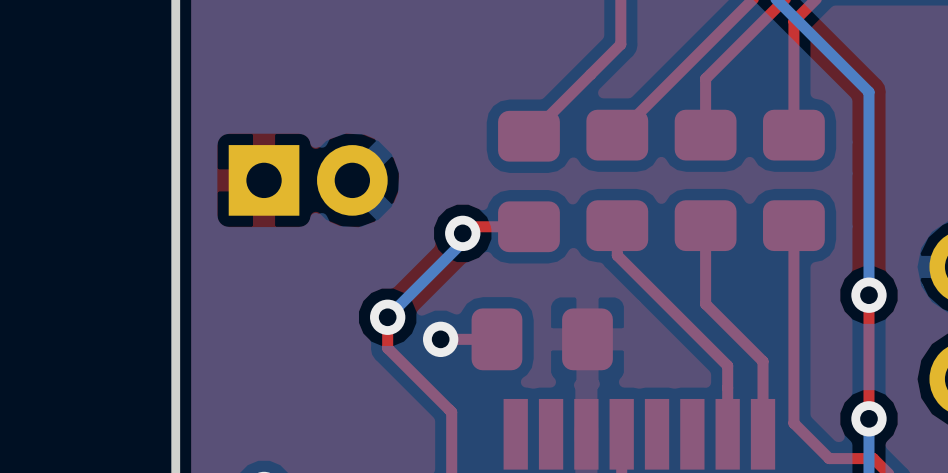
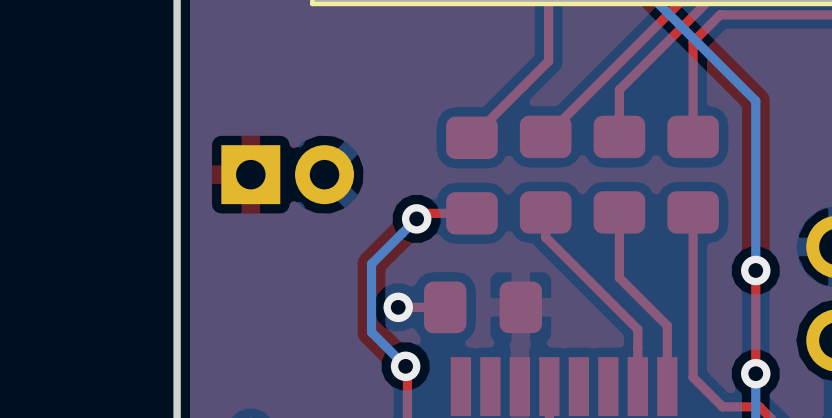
bottom track: (462, 233) (462, 242) (387, 317) -> (416, 218) (371, 264) (371, 332) (405, 366)
top track: (387, 317) (387, 348) (449, 410) -> none
via position: (387, 317) -> (405, 366)

